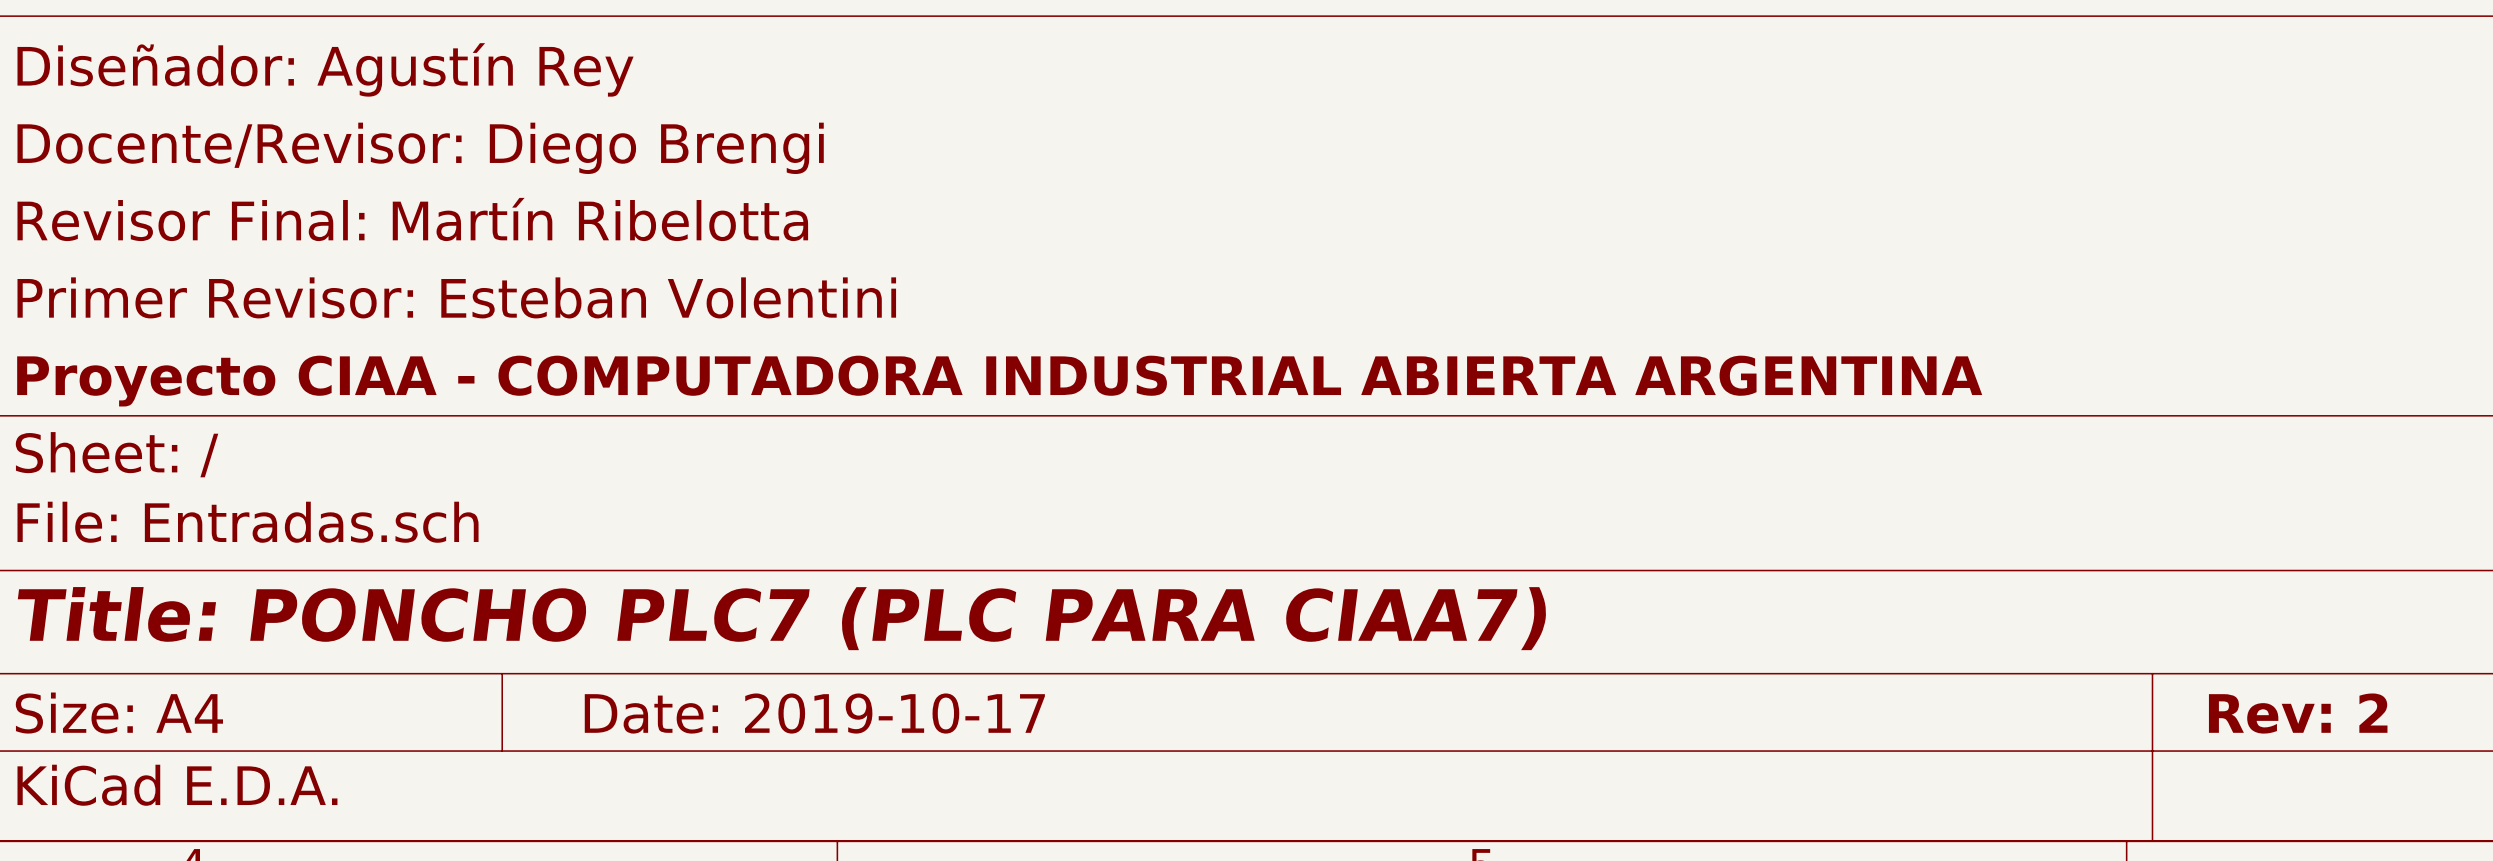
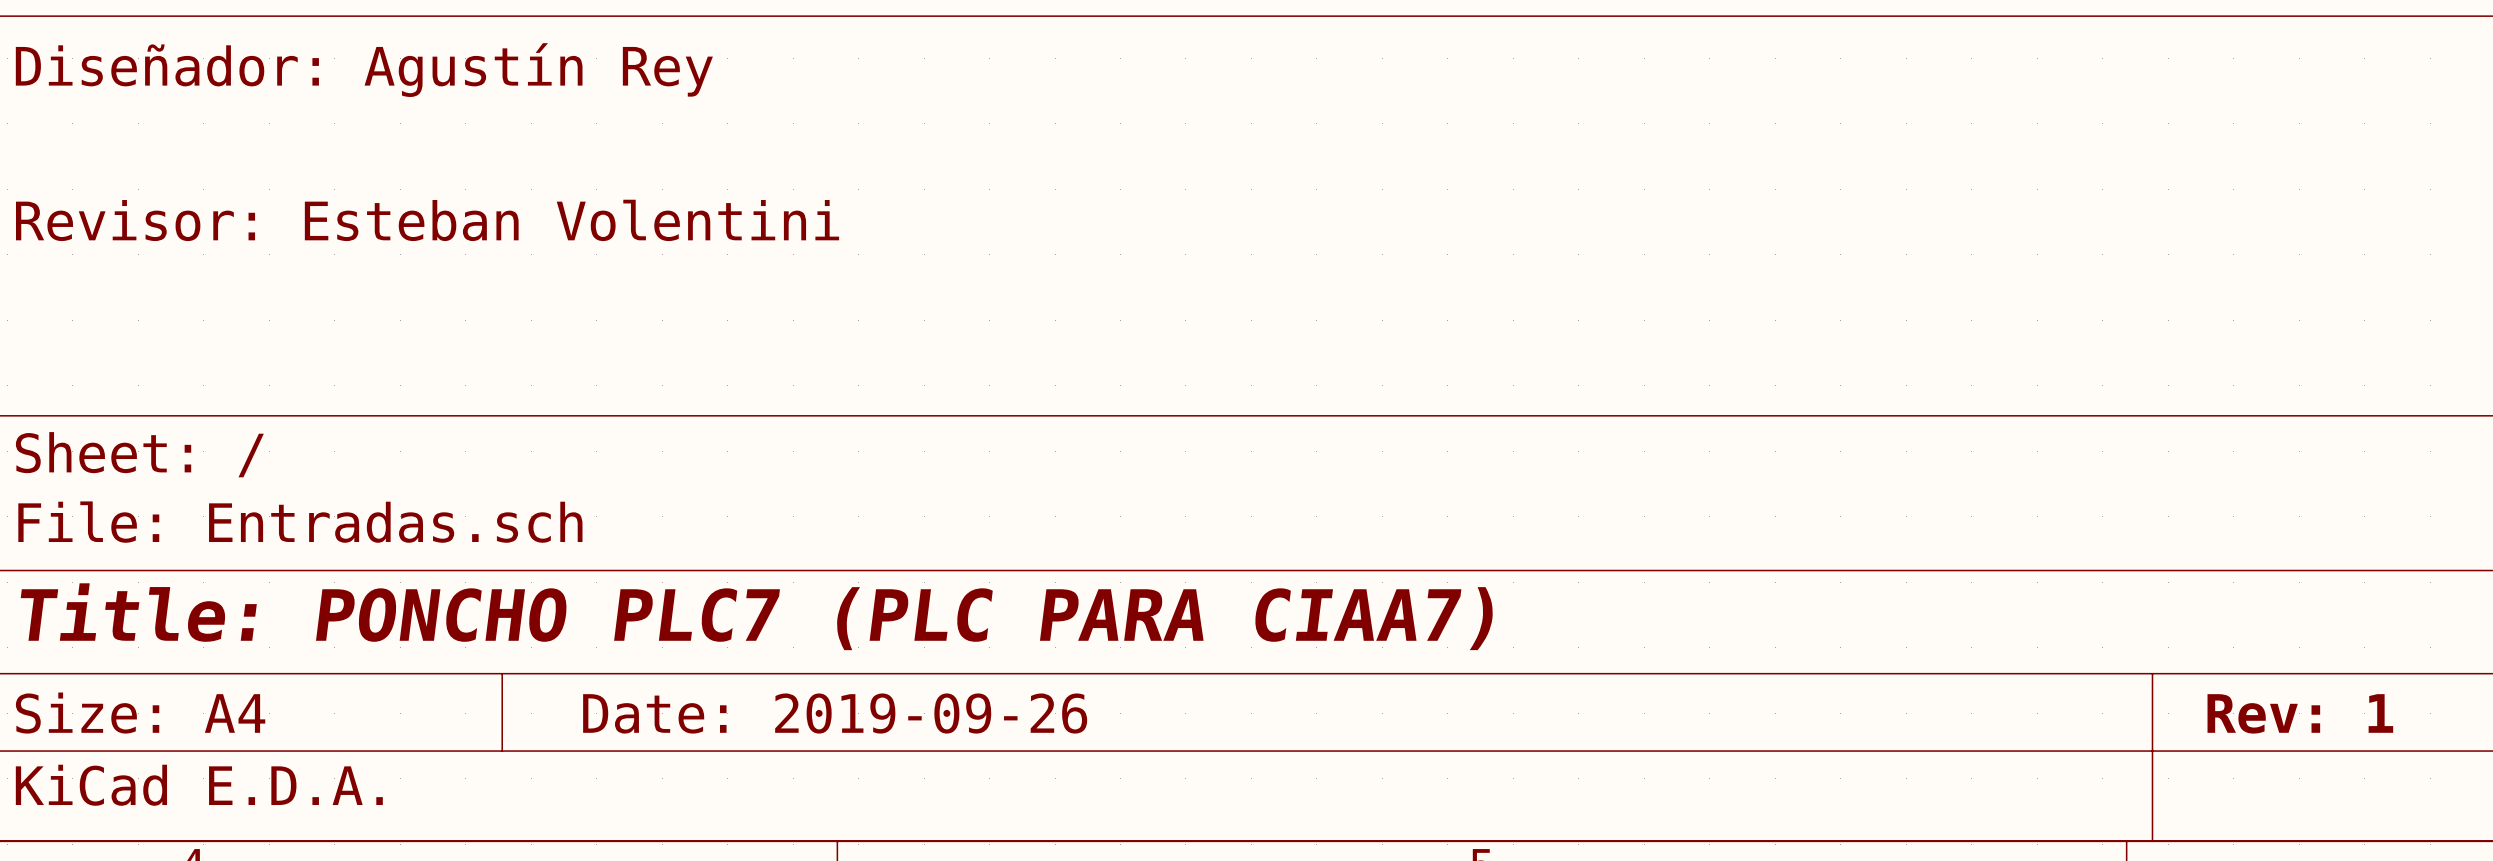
title block: Docente/Revisor: Diego Brengi (420, 148) -> none
title block: Revisor Final: Martín Ribelotta (412, 219) -> Revisor: Esteban Volentini (427, 220)
title block: Primer Revisor: Esteban Volentini (456, 297) -> none
title block: Proyecto CIAA - COMPUTADORA INDUSTRIAL ABIERTA ARGENTINA (999, 381) -> none
title block: Date: 2019-10-17 (814, 713) -> Date: 2019-09-26 (835, 713)
title block: Rev: 2 (2298, 713) -> Rev: 1 (2300, 713)

